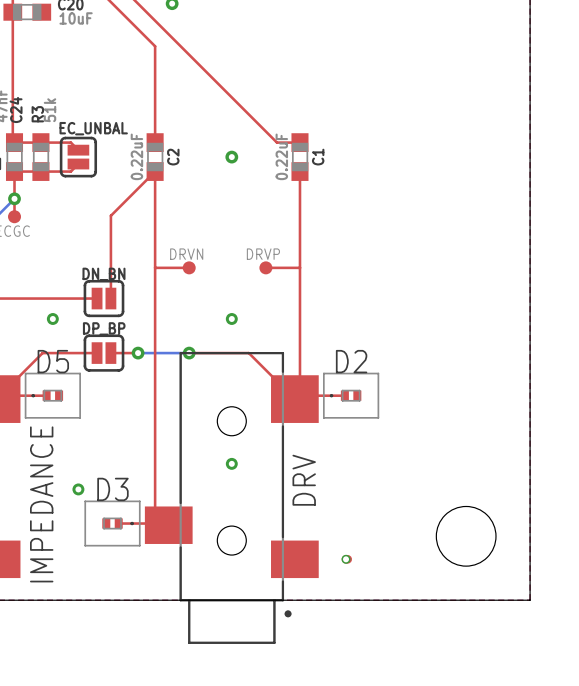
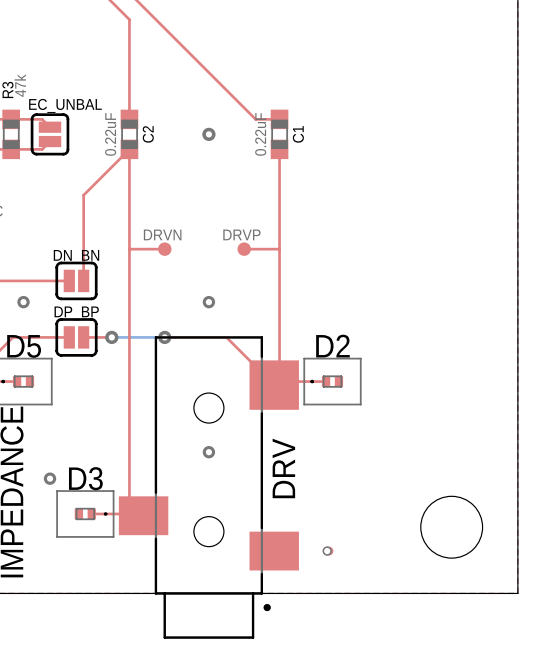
R3 value: 51k (50, 110) -> 47k (20, 85)

